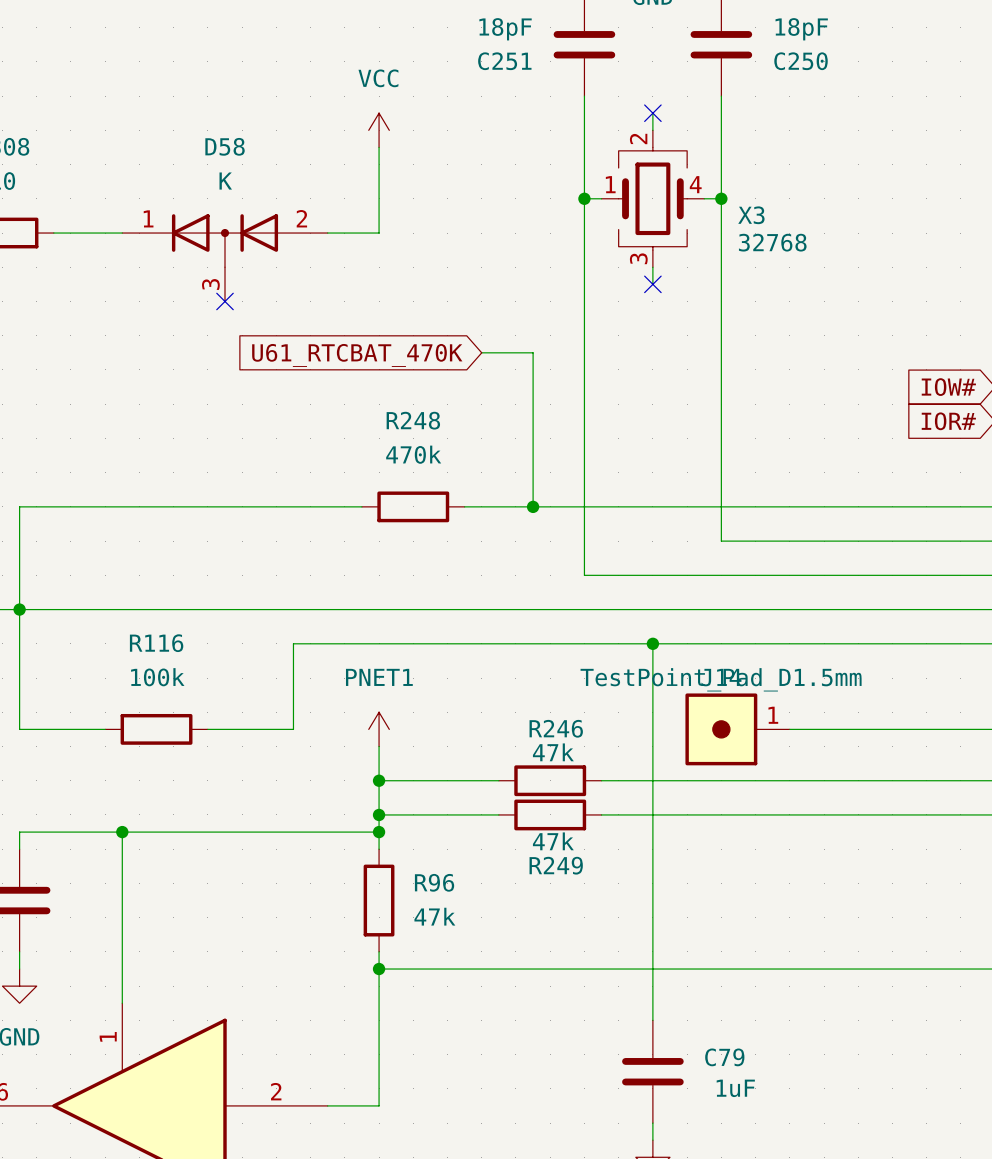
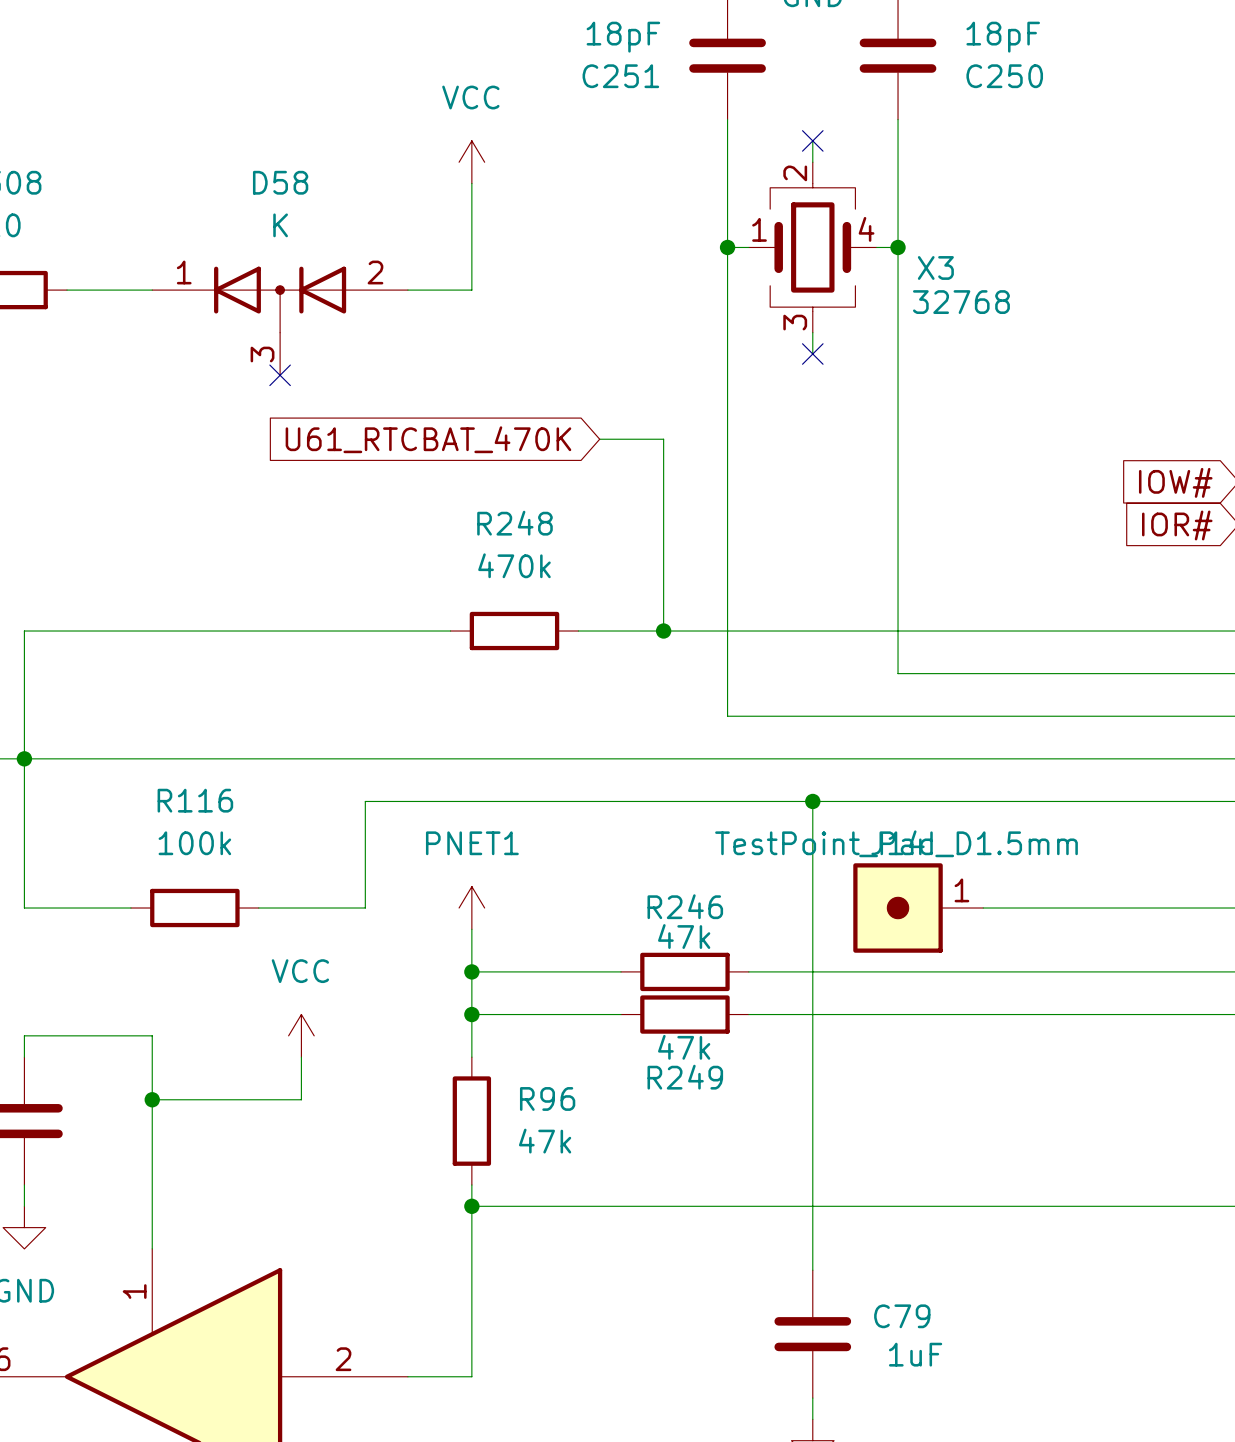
wire: (122, 832) (379, 832) -> none
junction position: (122, 832) -> (152, 1099)
power symbol: none -> VCC (301, 1035)
junction: (379, 832) -> none
wire: none -> (301, 1057) (301, 1099) (152, 1099)

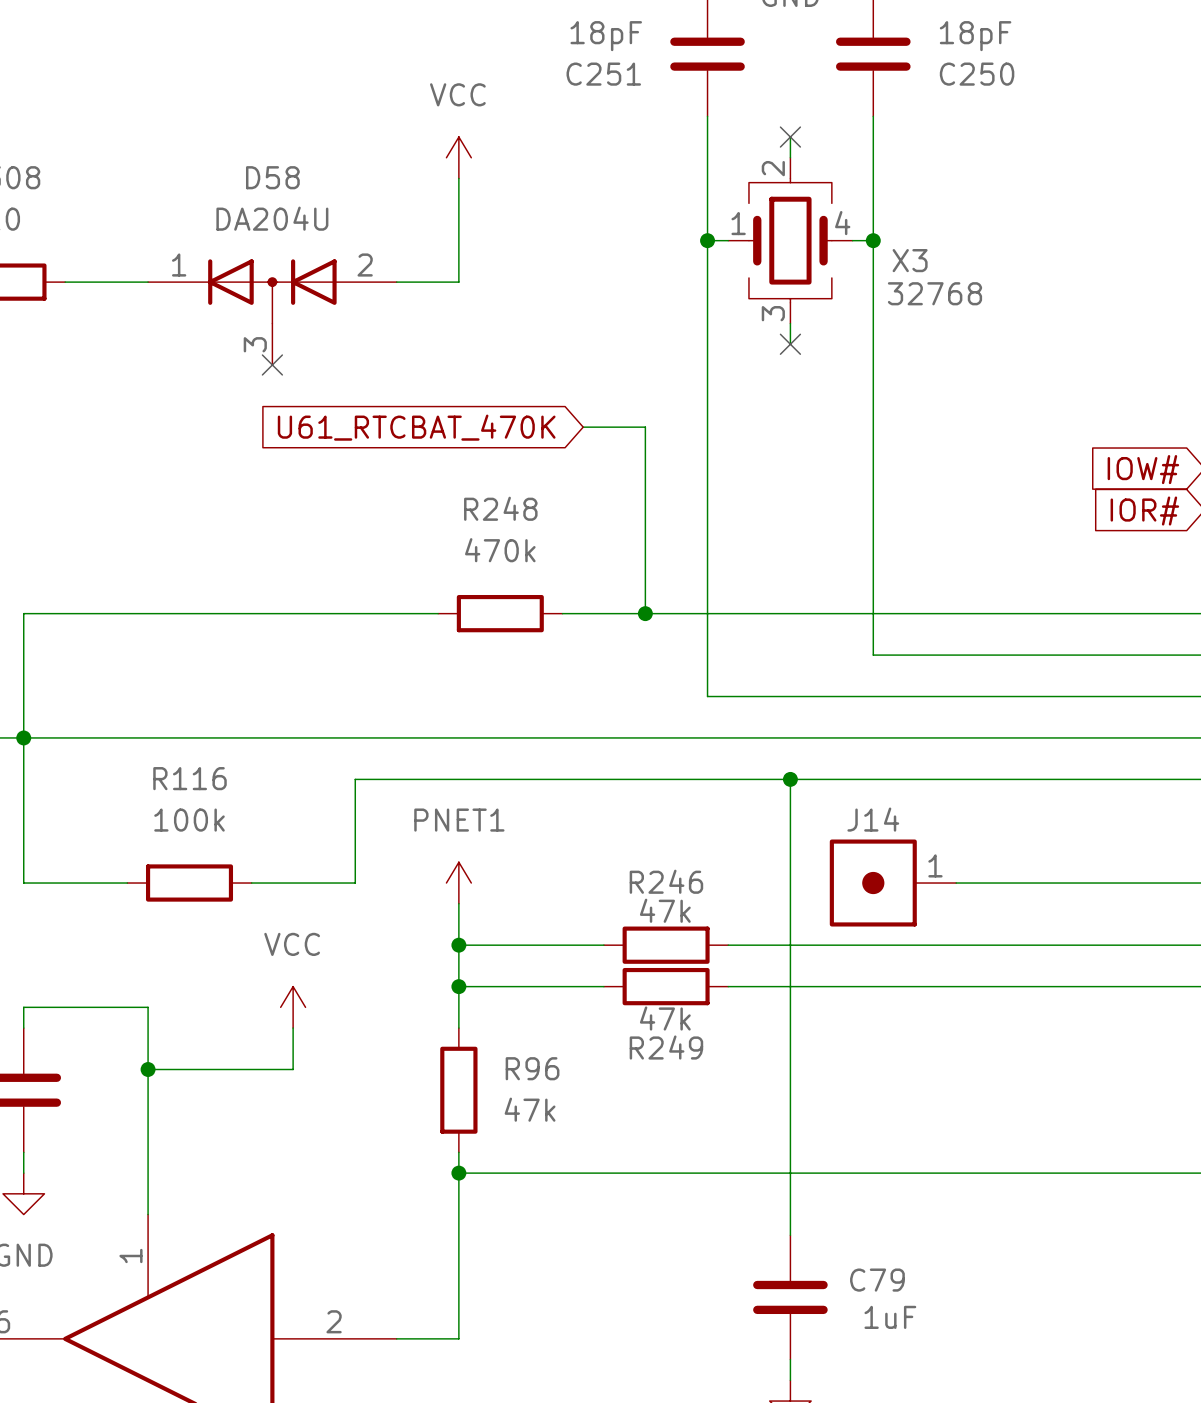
D58 value: K (280, 225) -> DA204U (272, 218)
J14 value: TestPoint_Pad_D1.5mm (896, 844) -> none

